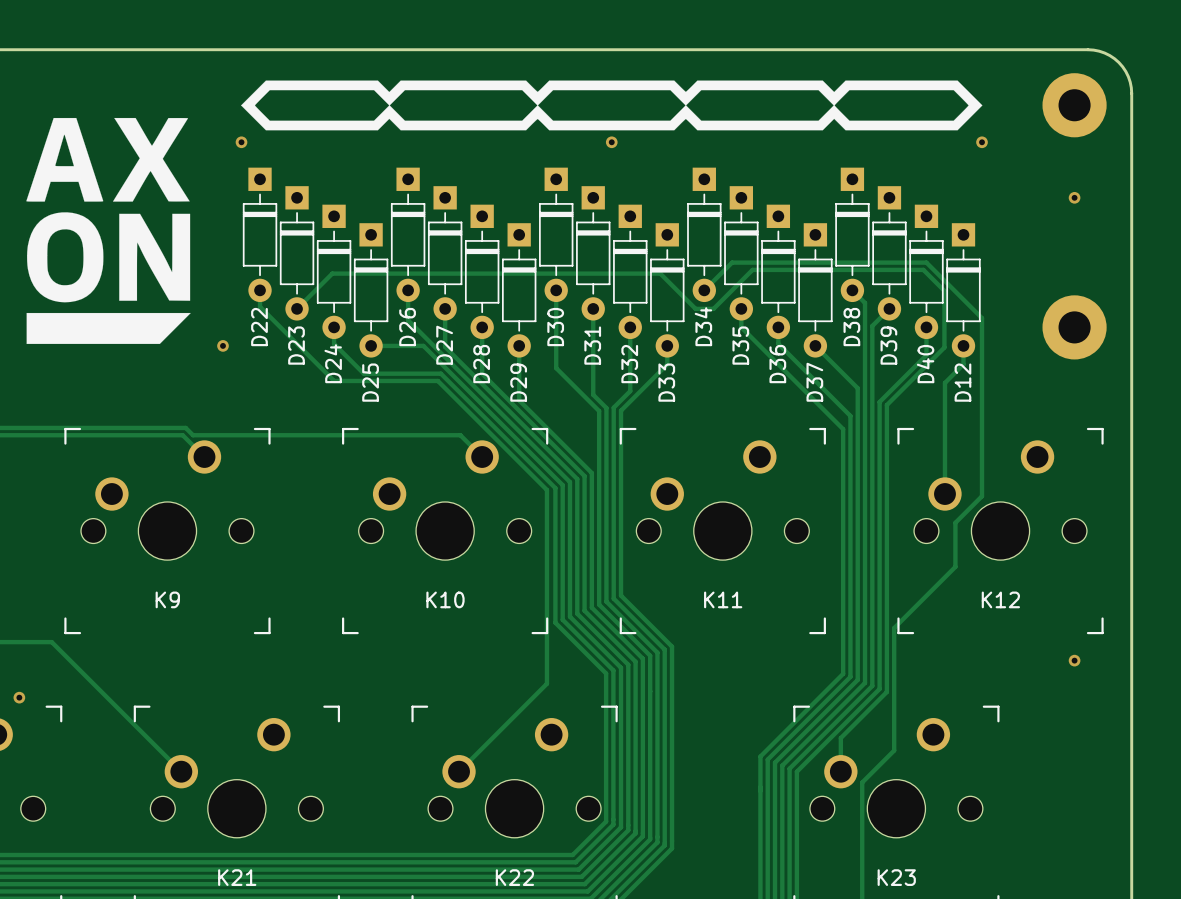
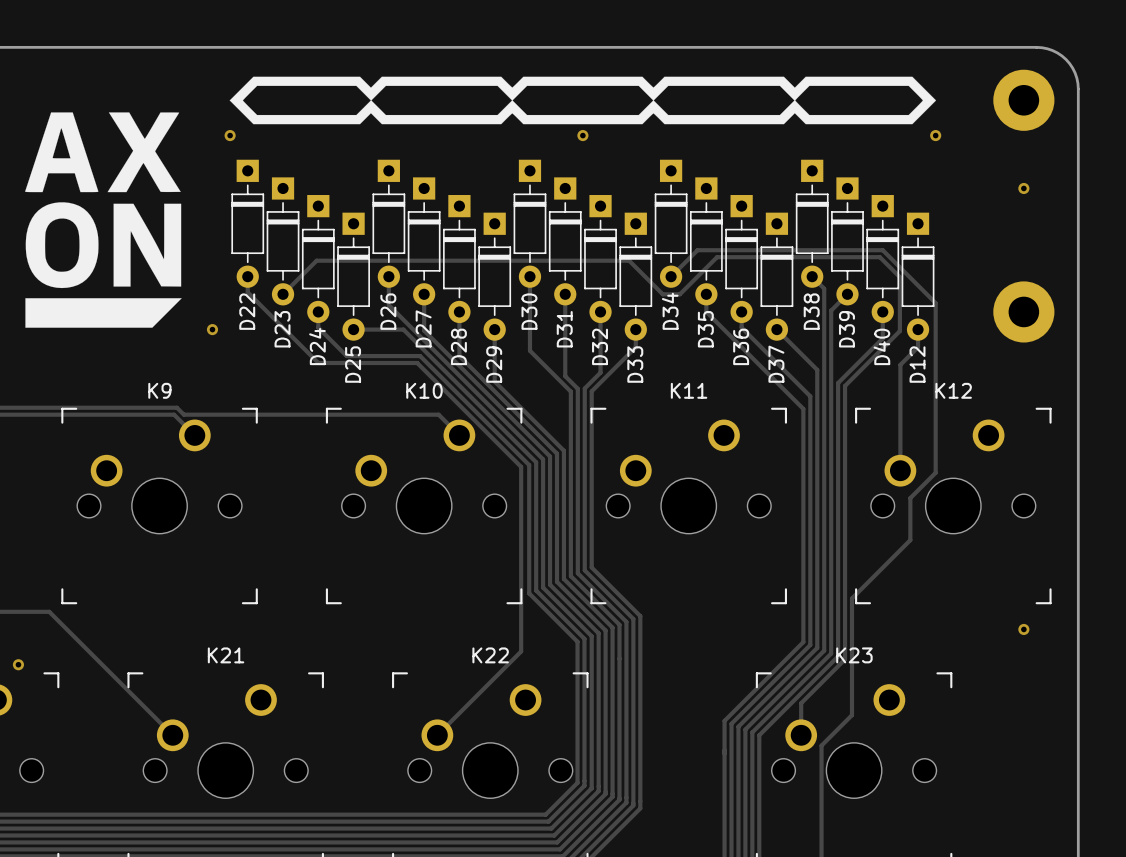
K9 name position: K9 (167, 599) -> K9 (159, 390)
K10 name position: K10 (445, 599) -> K10 (424, 390)
K11 name position: K11 (723, 599) -> K11 (689, 390)
K12 name position: K12 (1000, 599) -> K12 (953, 390)
K21 name position: K21 (237, 877) -> K21 (226, 655)
K22 name position: K22 (514, 877) -> K22 (490, 655)
K23 name position: K23 (896, 877) -> K23 (854, 655)

